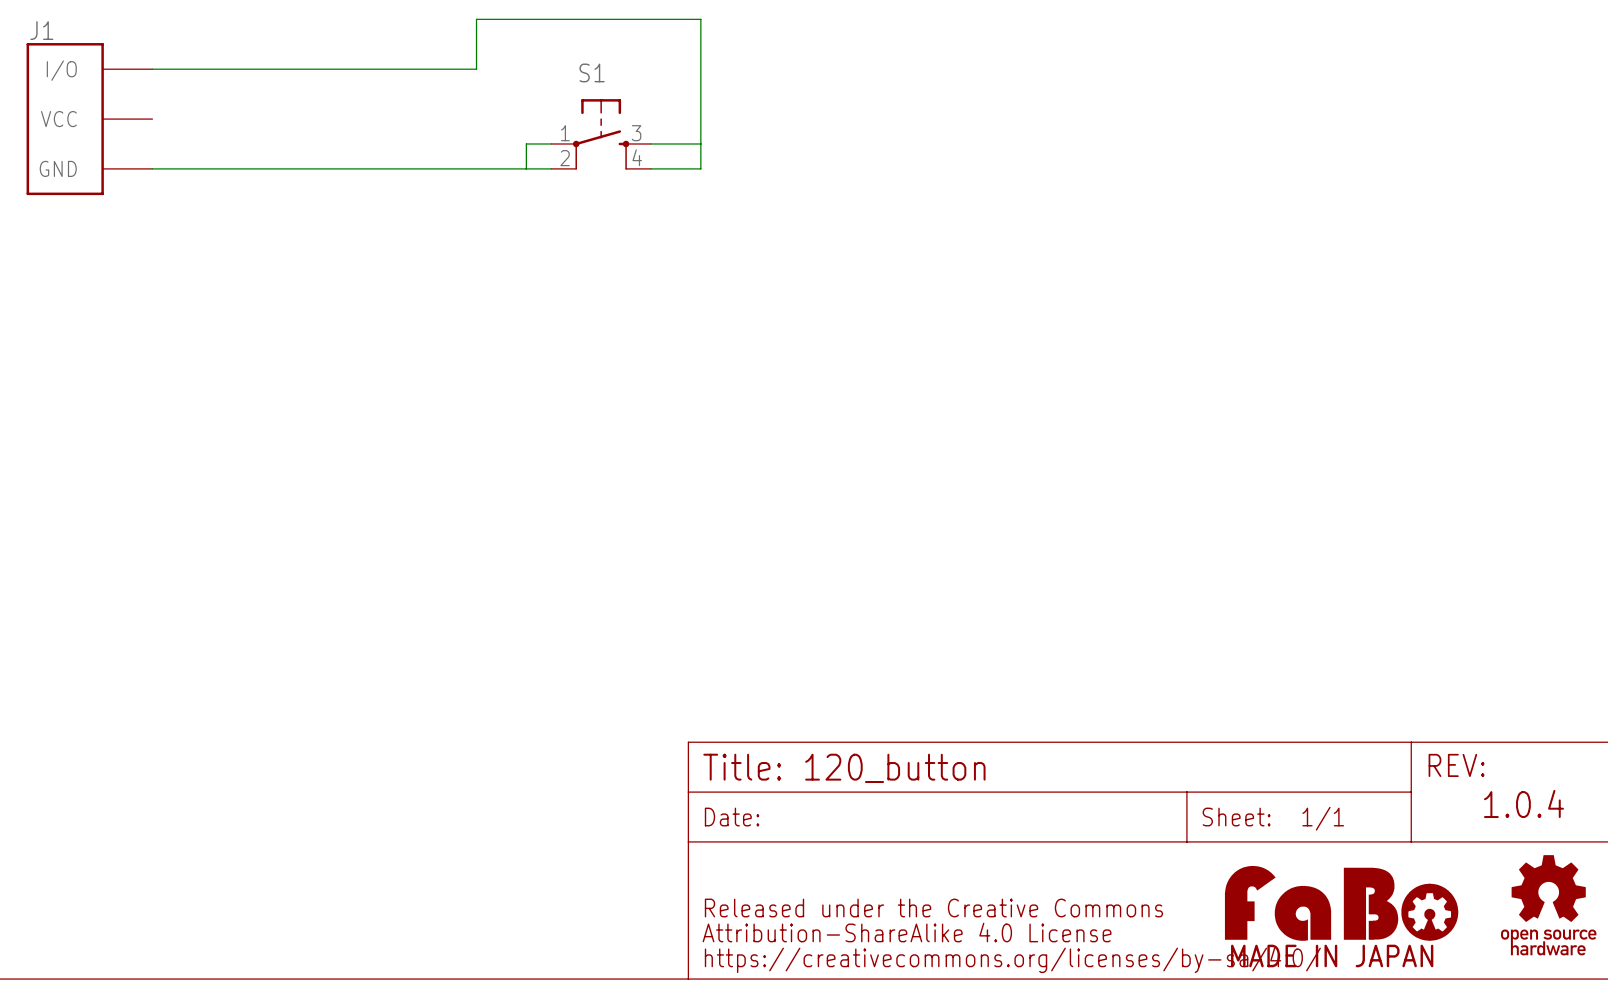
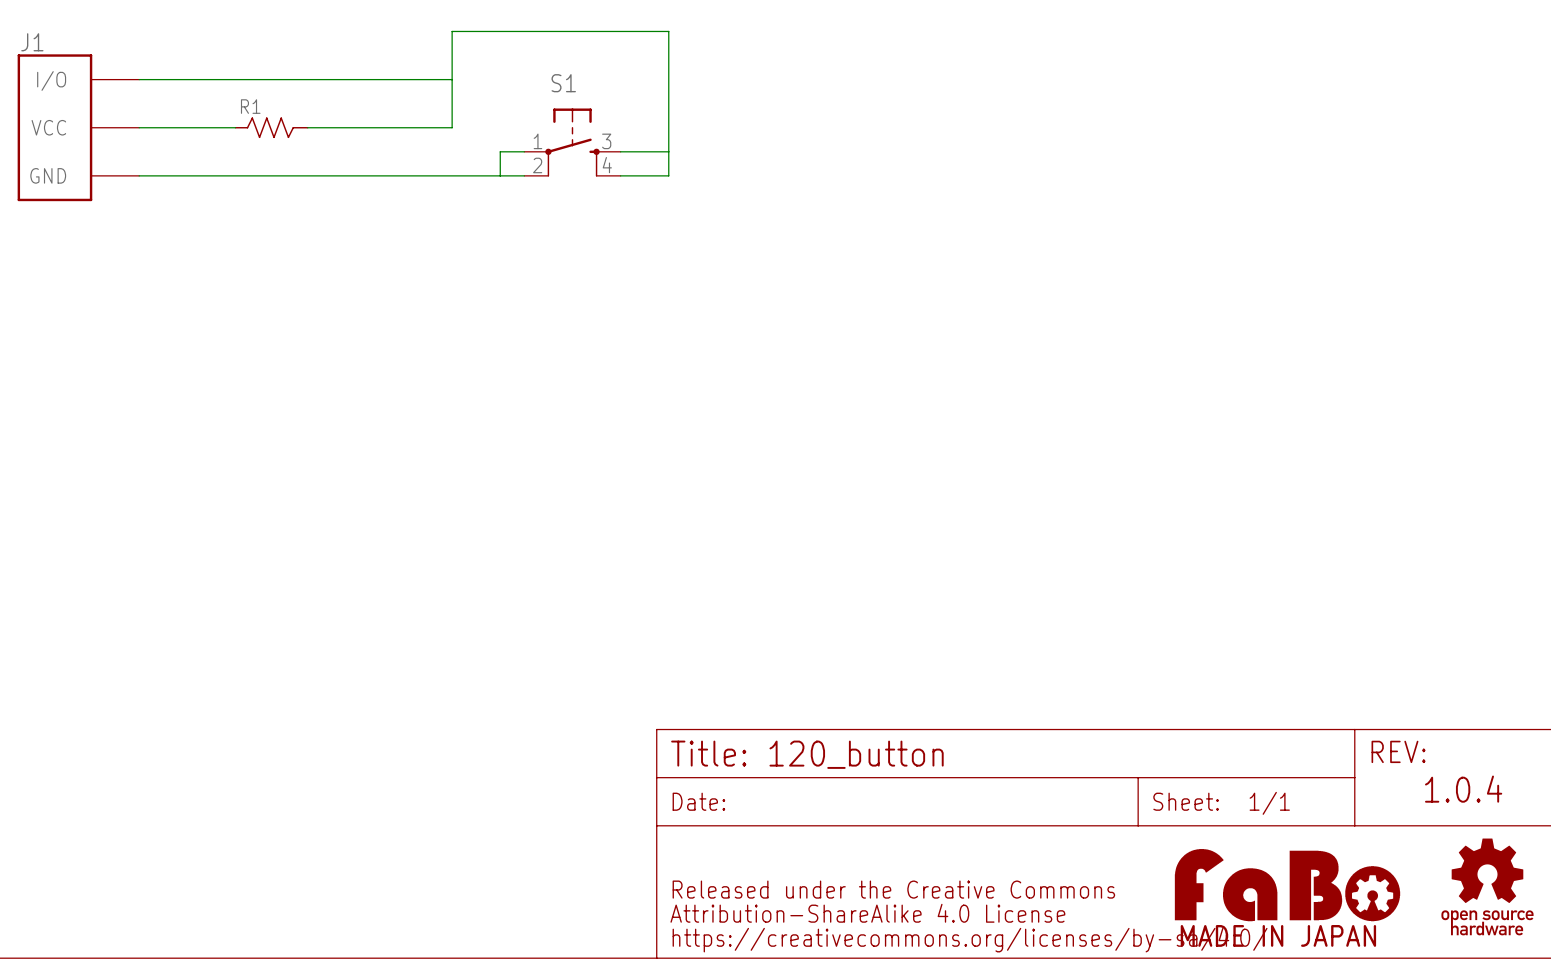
wire: none -> (452, 79) (452, 127) (307, 127)
wire: none -> (139, 127) (235, 127)
R1: none -> (271, 127)

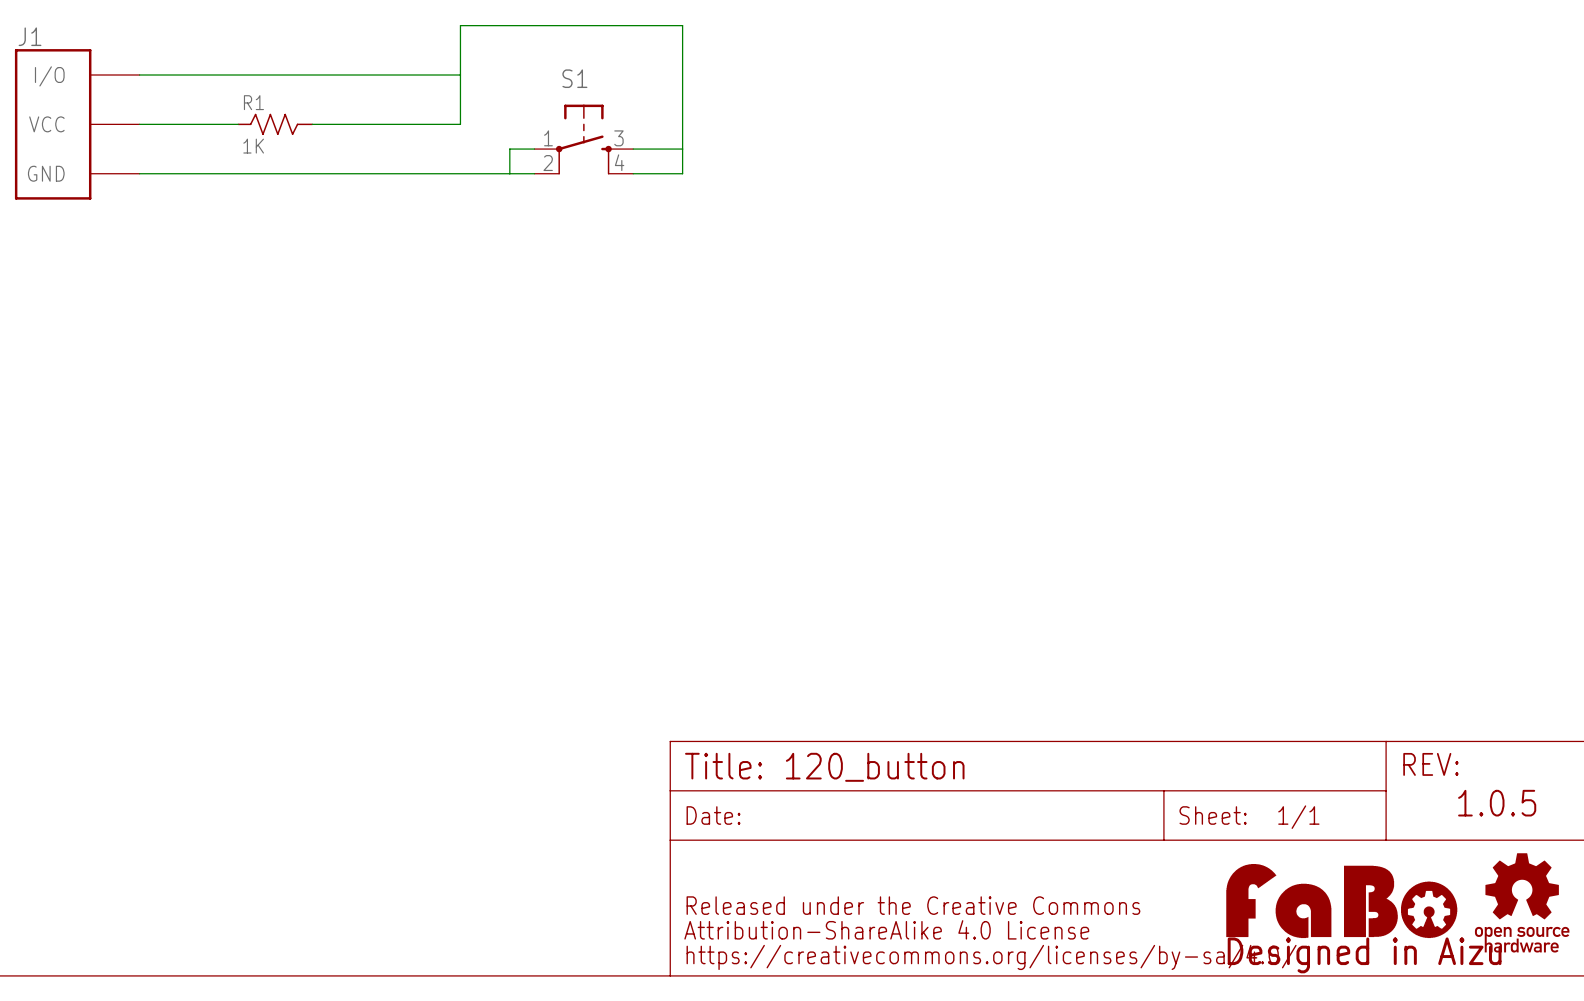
R1 value: none -> 1K (253, 146)
text: 1.0.4 (1463, 789) -> 1.0.5 (1497, 803)
part: (1287, 885) -> none
part: none -> (1341, 901)

